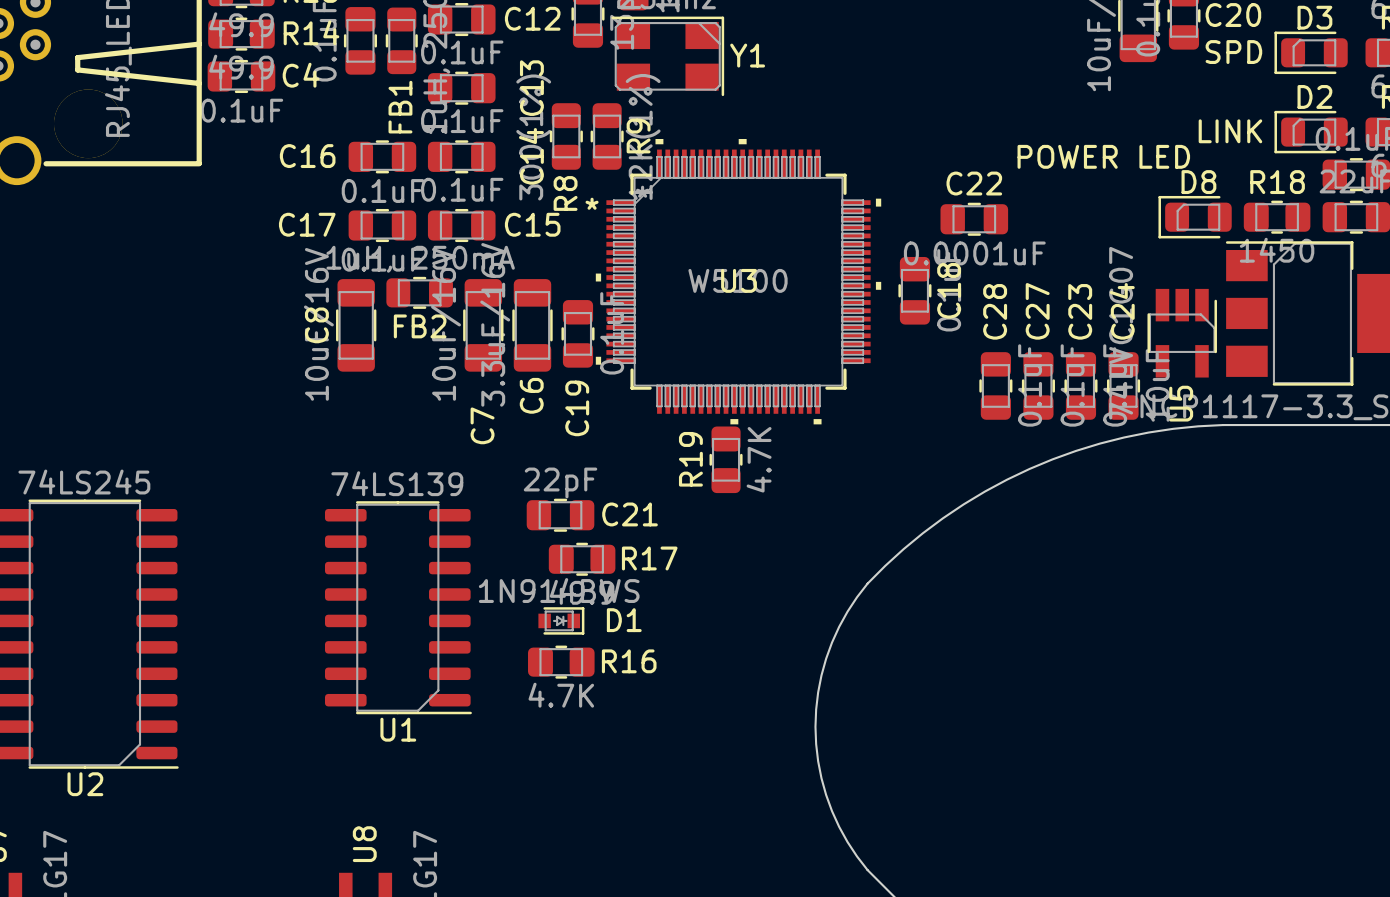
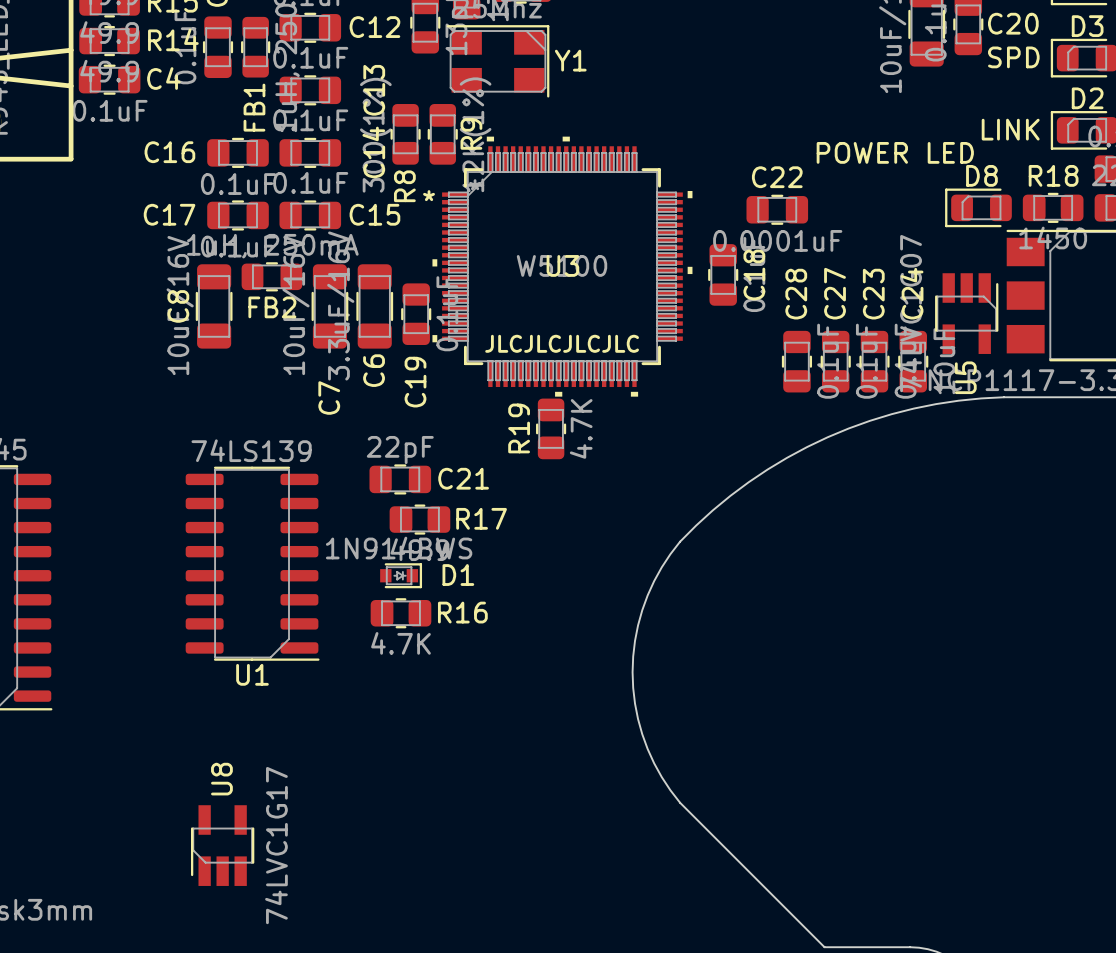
text: none -> JLCJLCJLCJLC (562, 343)

